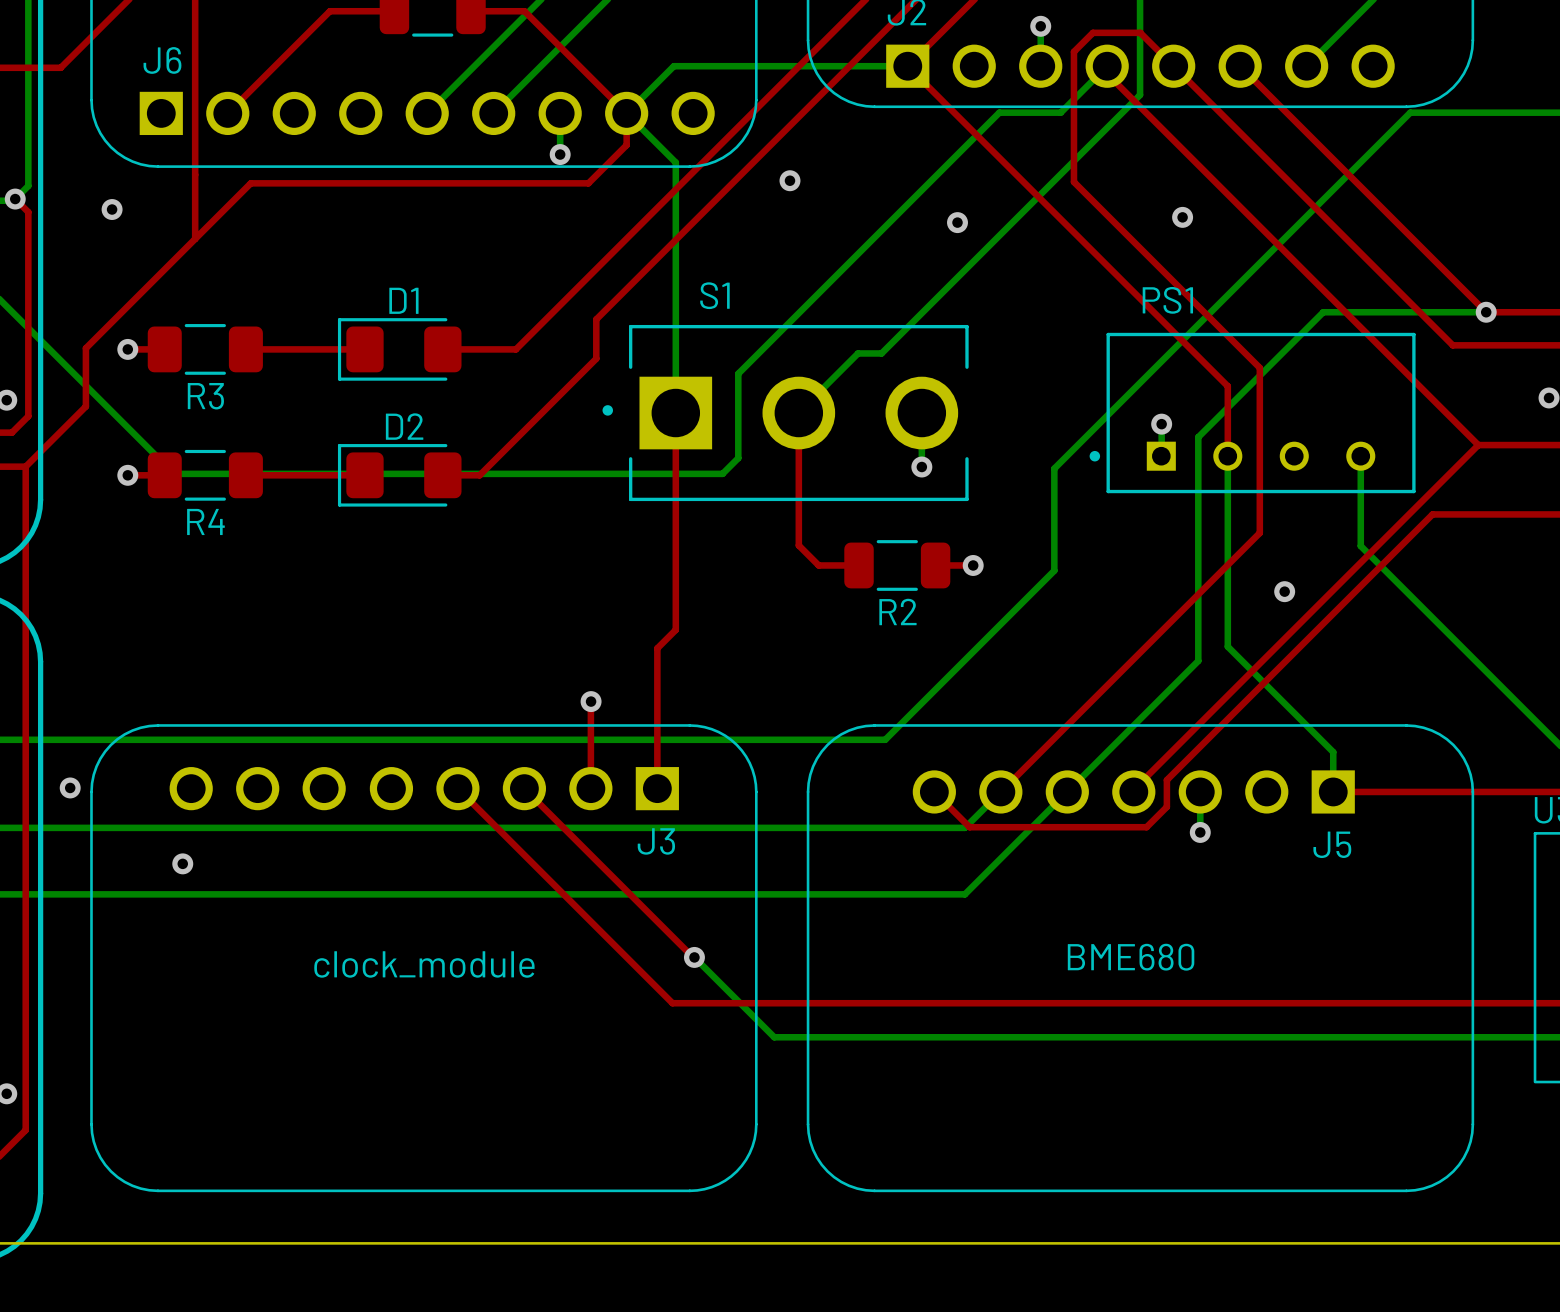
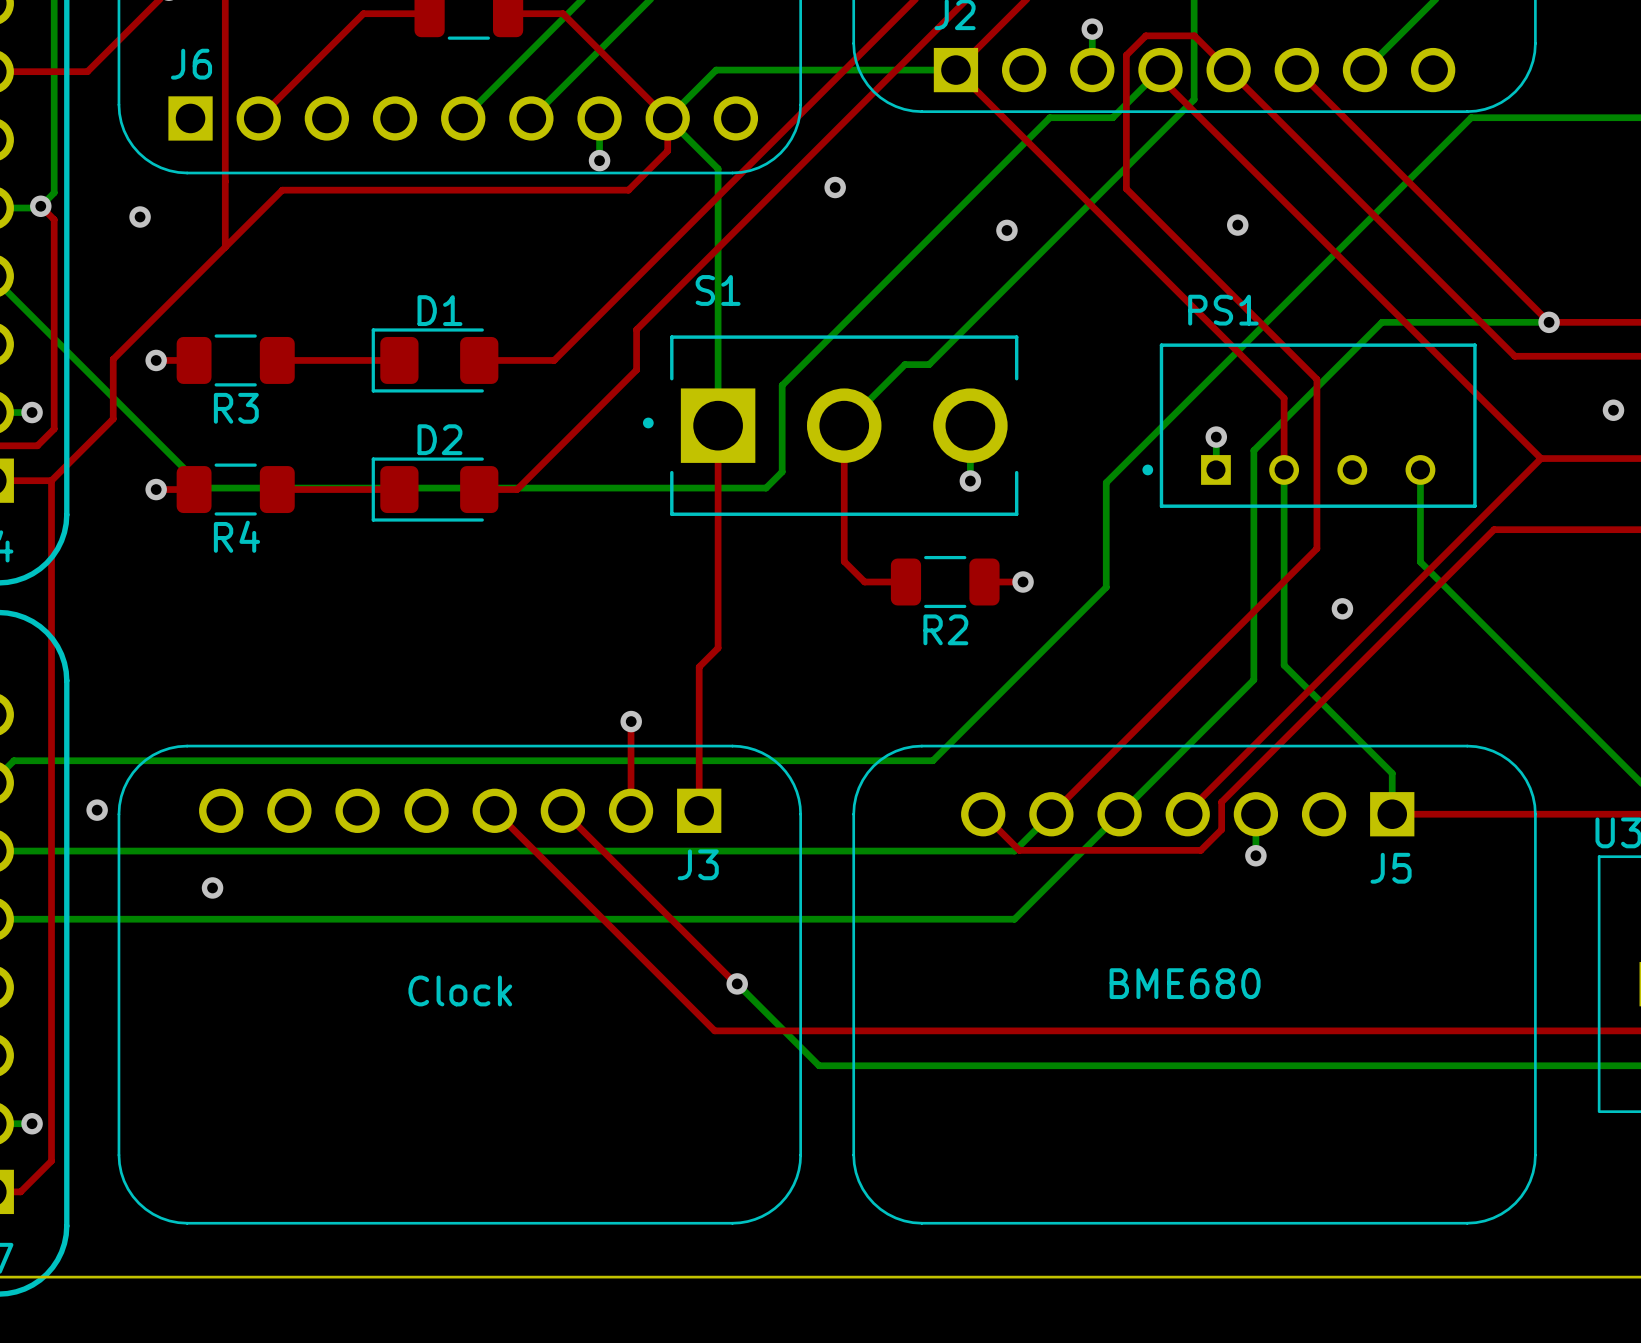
S1 name position: S1 (714, 295) -> S1 (718, 290)
J3 value: clock_module (424, 964) -> Clock (460, 990)

